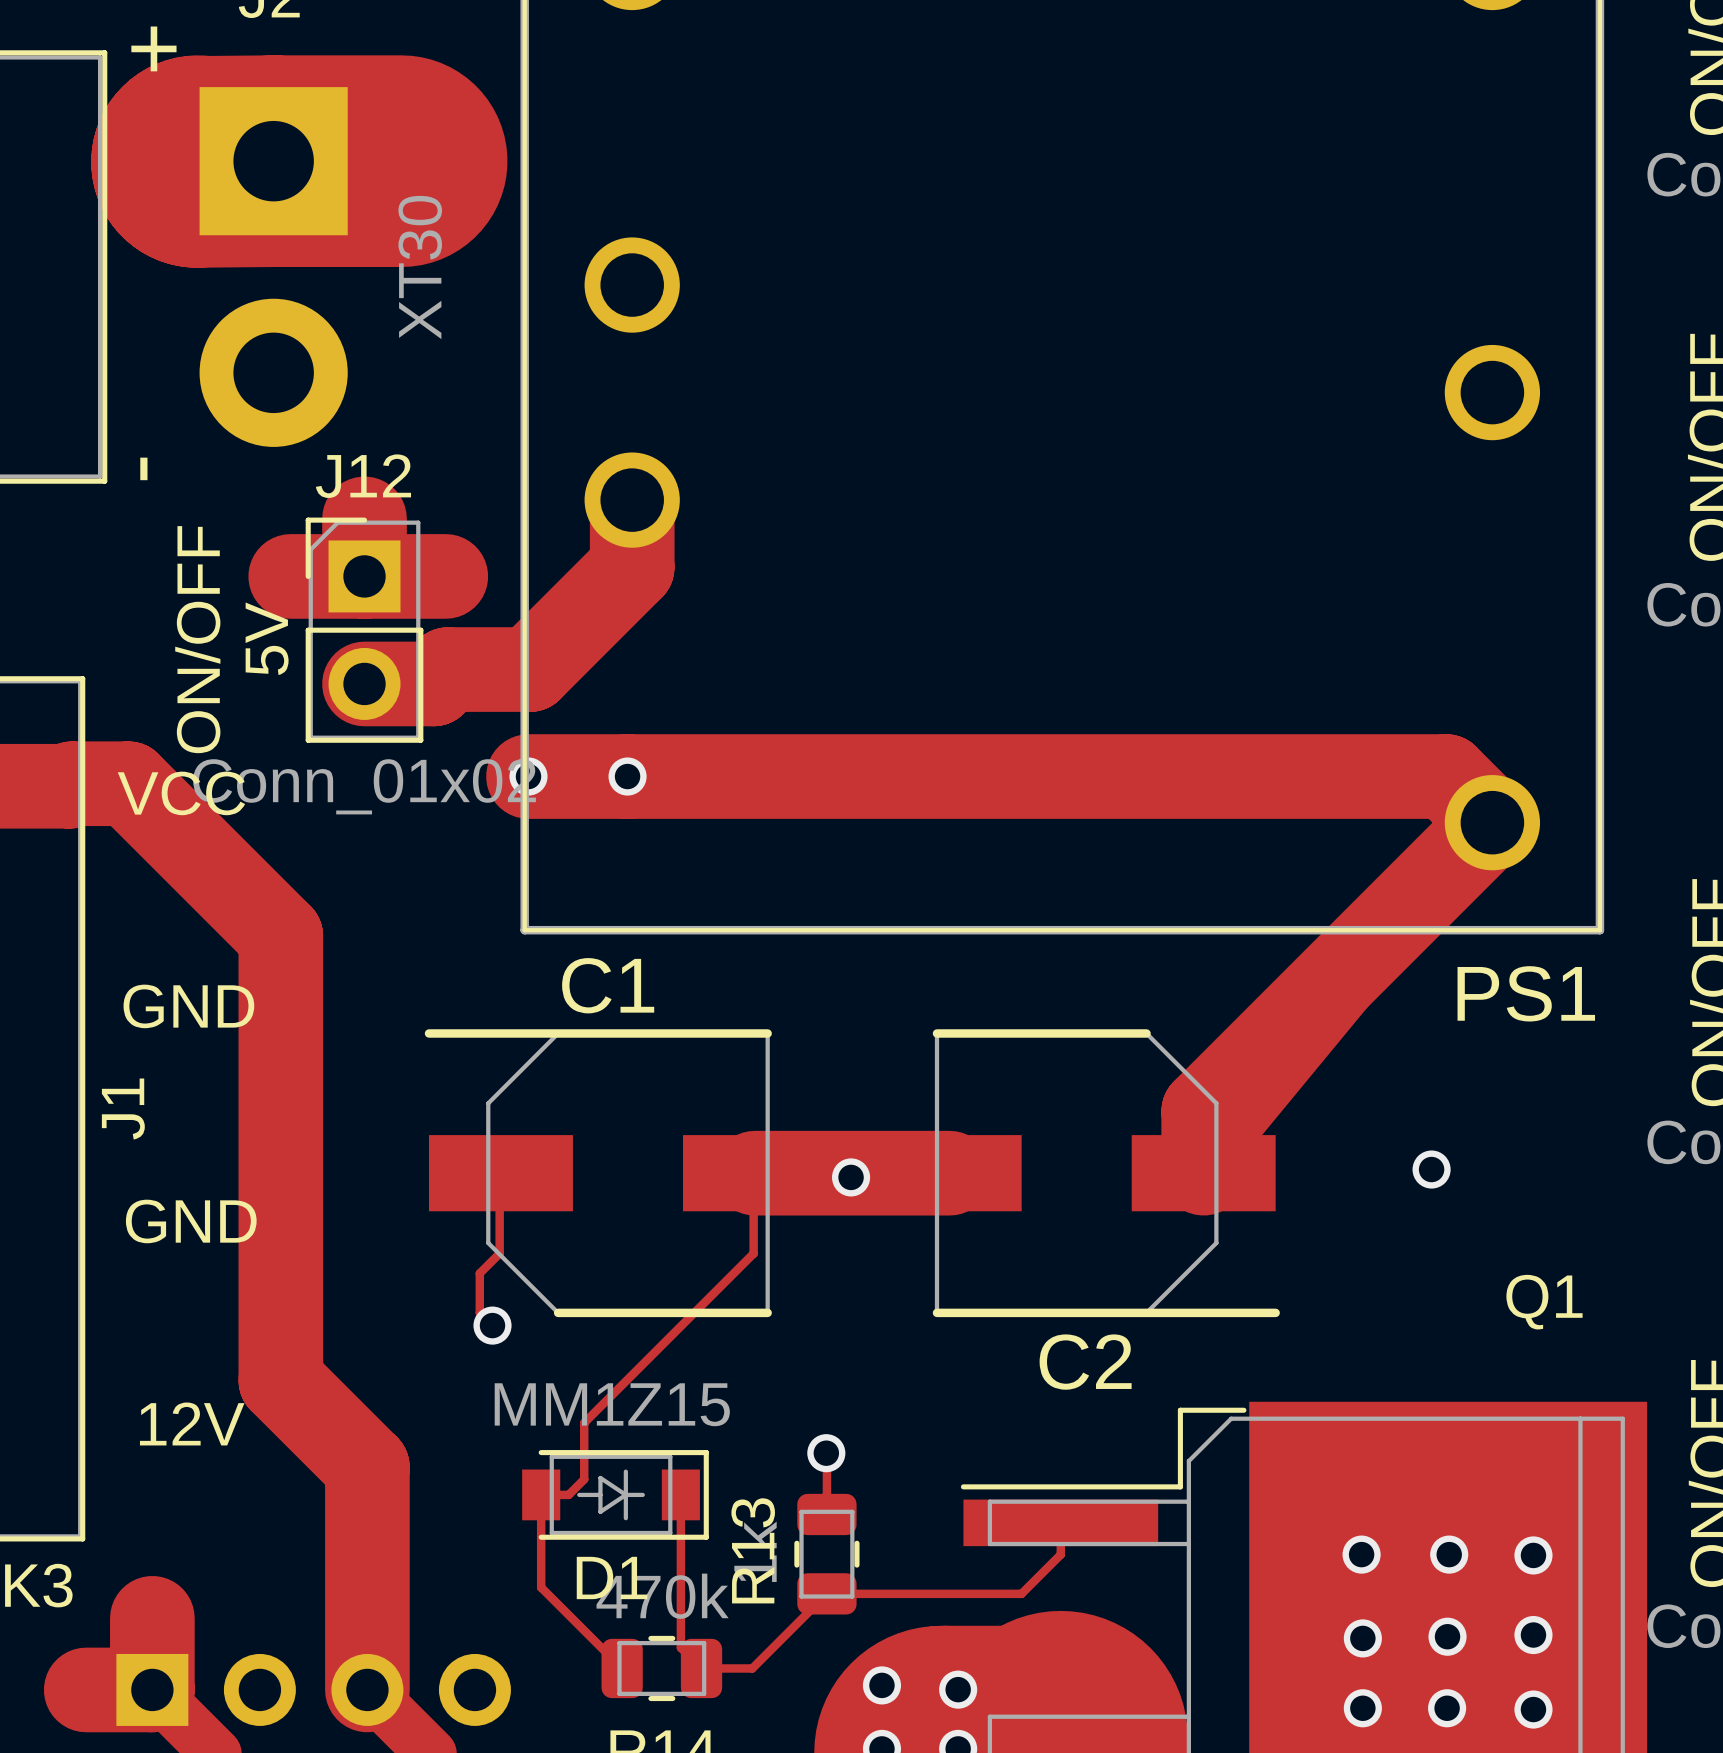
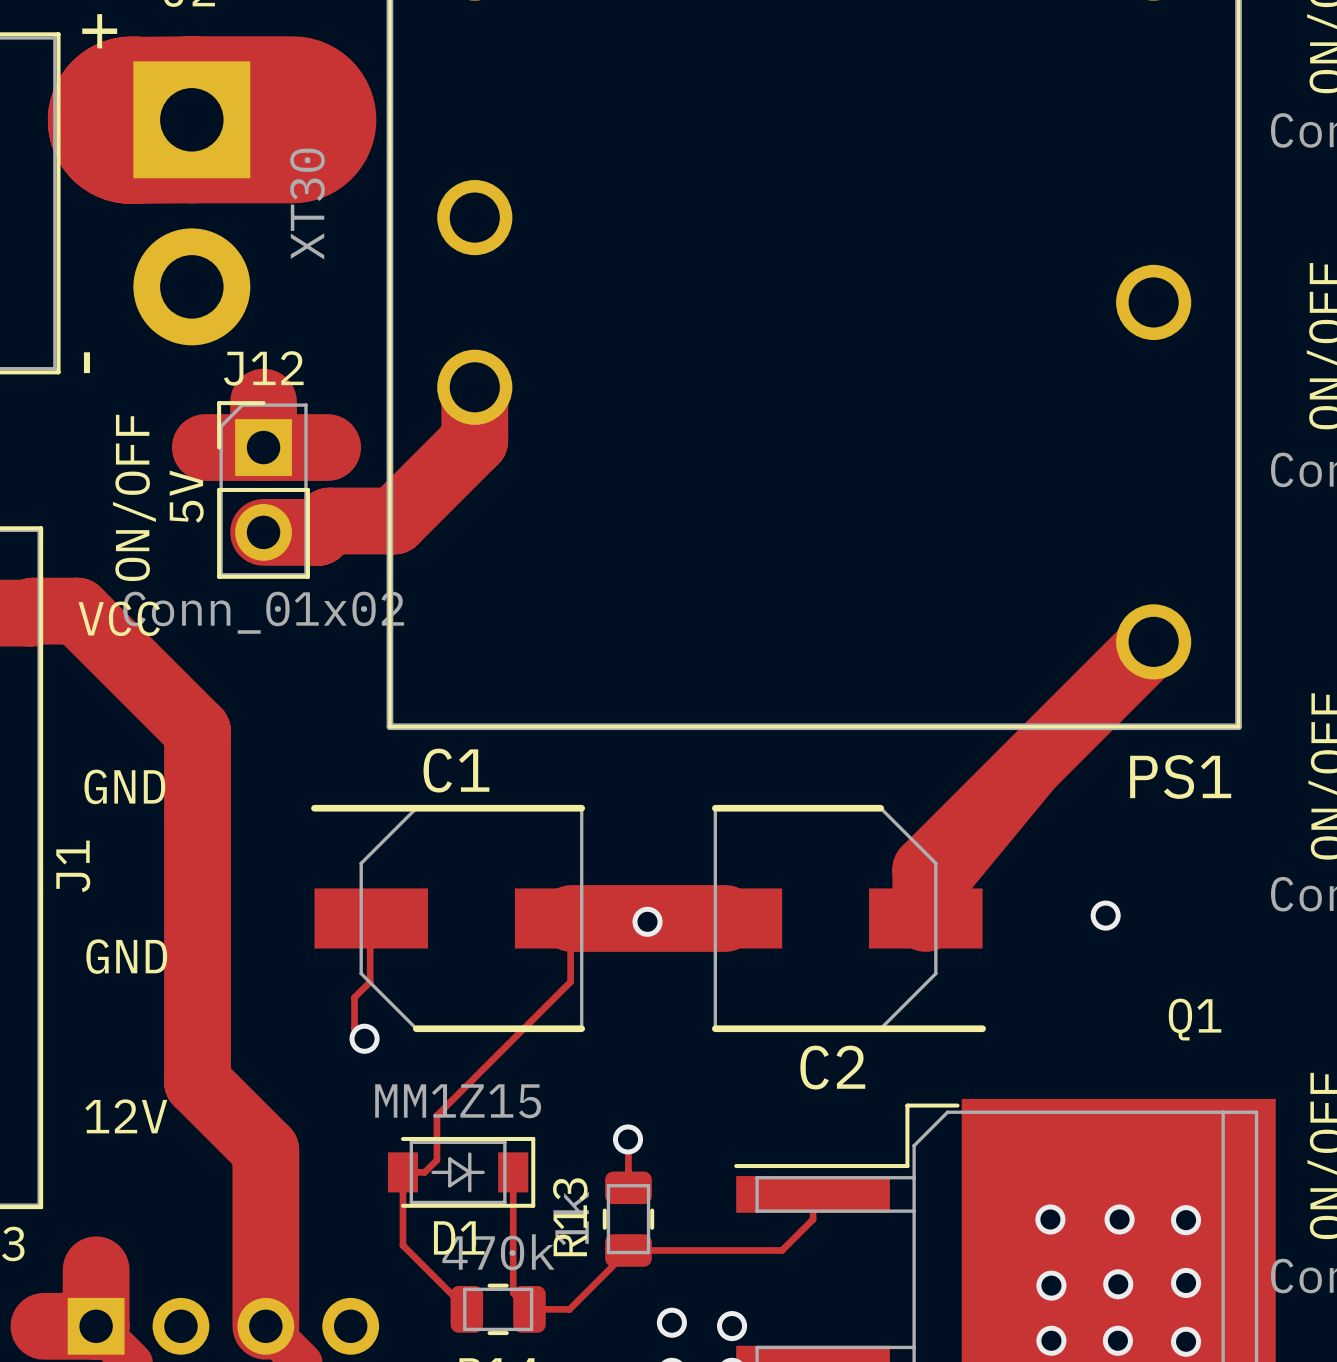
track: (528, 776) (1446, 776) (1492, 822) -> none
via: (528, 776) -> none
via: (627, 776) -> none

